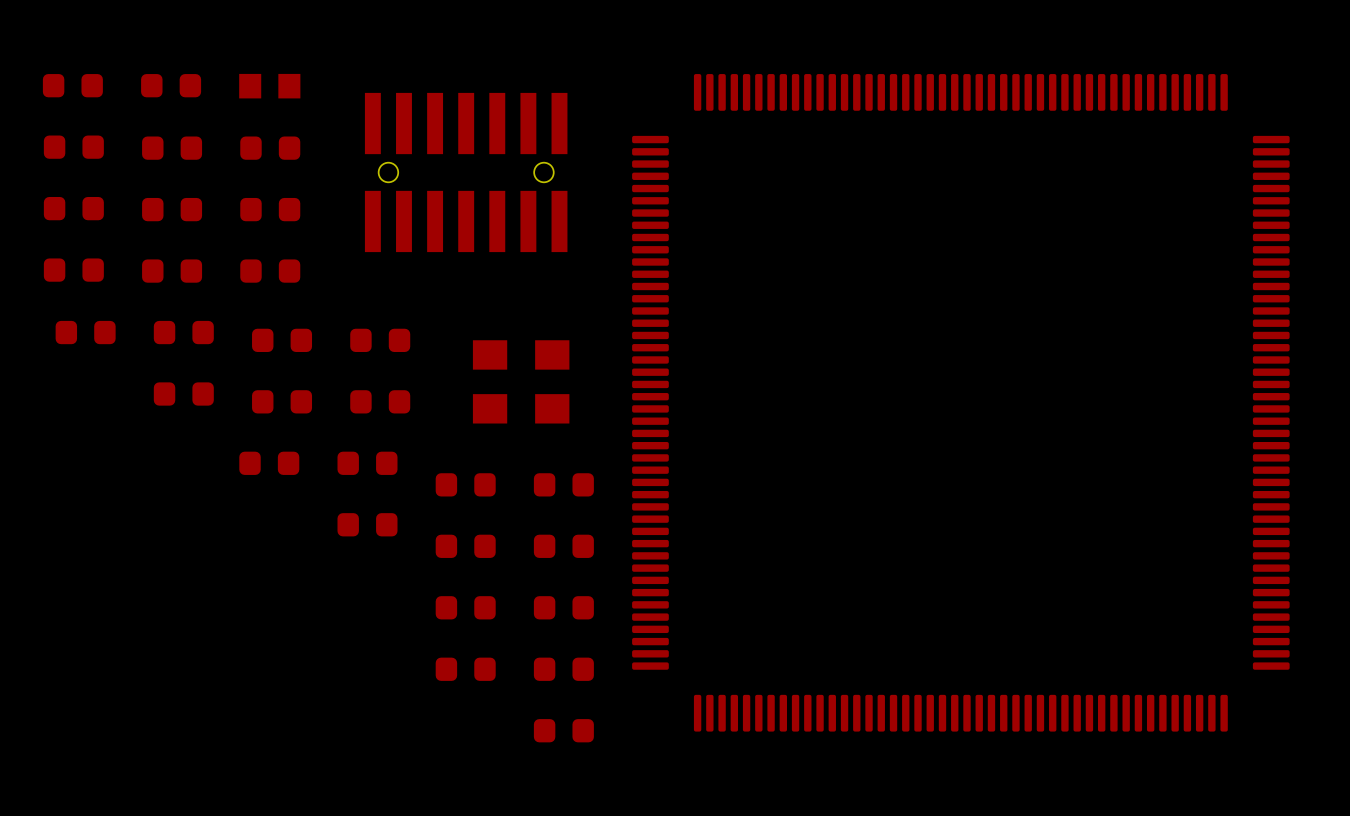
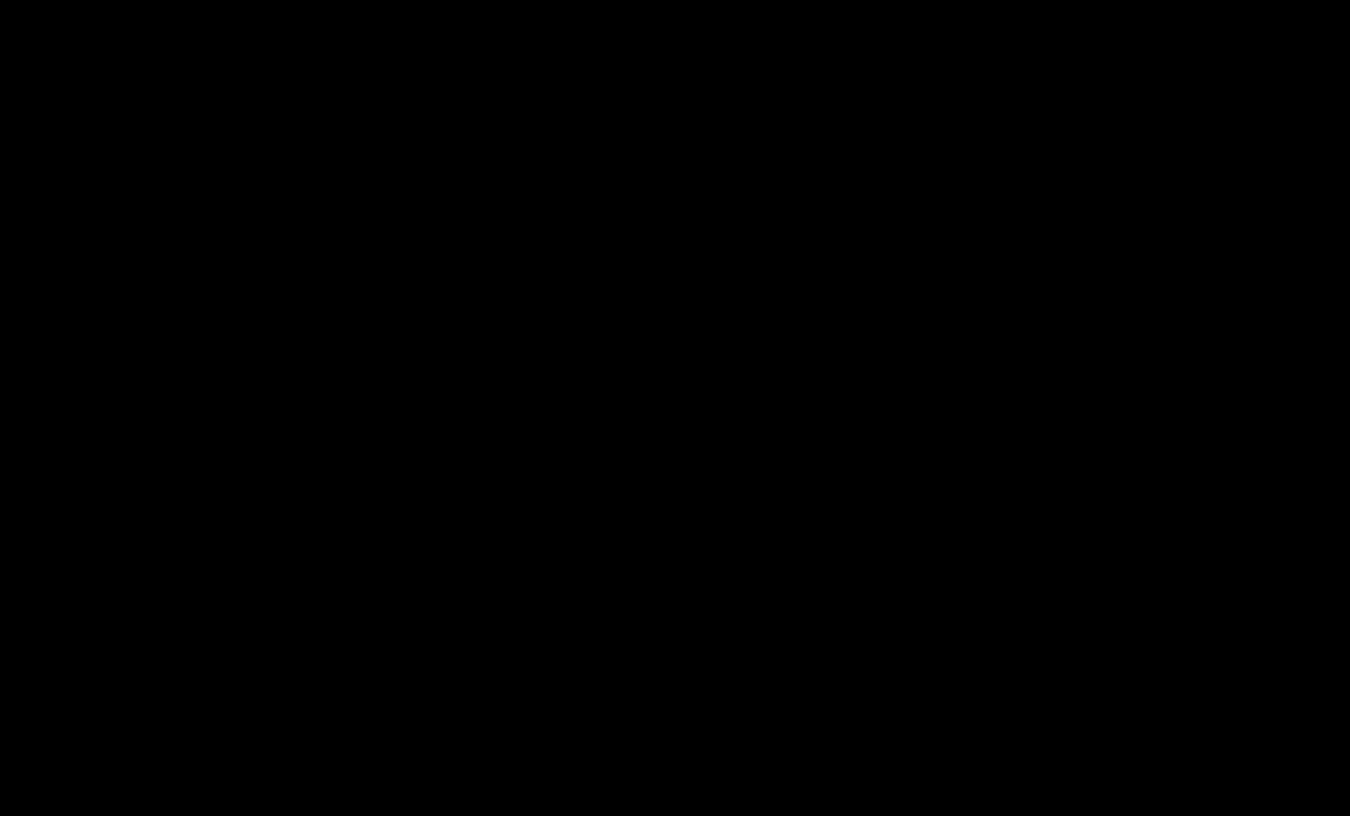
part: (72, 85) -> none
part: (171, 85) -> none
part: (269, 86) -> none
part: (73, 147) -> none
part: (172, 148) -> none
part: (270, 148) -> none
part: (466, 172) -> none
part: (73, 208) -> none
part: (172, 209) -> none
part: (270, 209) -> none
part: (73, 270) -> none
part: (172, 271) -> none
part: (270, 271) -> none
part: (85, 332) -> none
part: (183, 332) -> none
part: (282, 340) -> none
part: (380, 340) -> none
part: (521, 381) -> none
part: (183, 394) -> none
part: (282, 401) -> none
part: (380, 401) -> none
part: (960, 402) -> none
part: (269, 463) -> none
part: (367, 463) -> none
part: (465, 484) -> none
part: (563, 484) -> none
part: (367, 524) -> none
part: (465, 546) -> none
part: (563, 546) -> none
part: (465, 607) -> none
part: (563, 607) -> none
part: (465, 669) -> none
part: (563, 669) -> none
part: (563, 730) -> none

